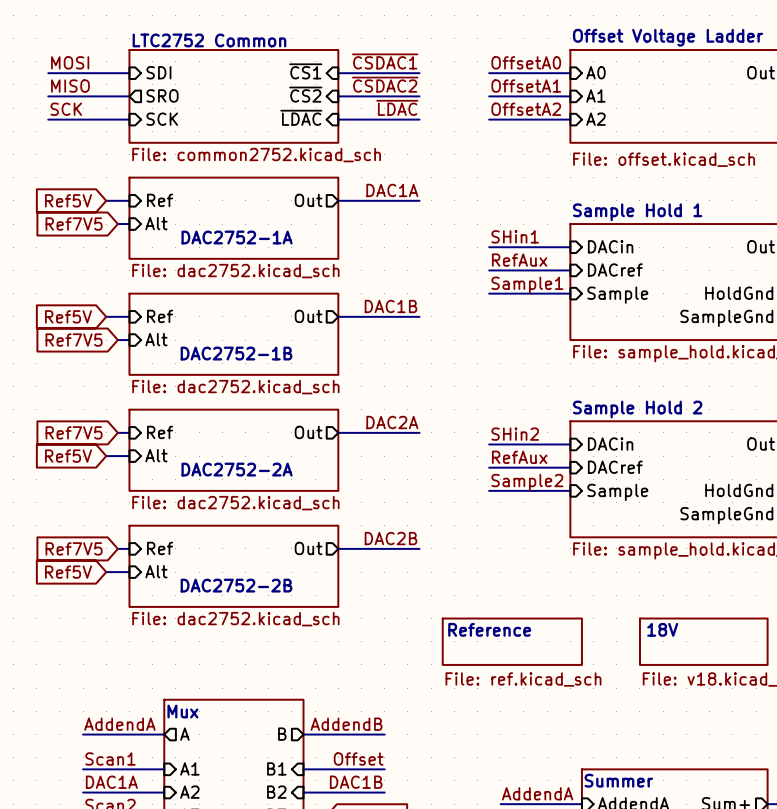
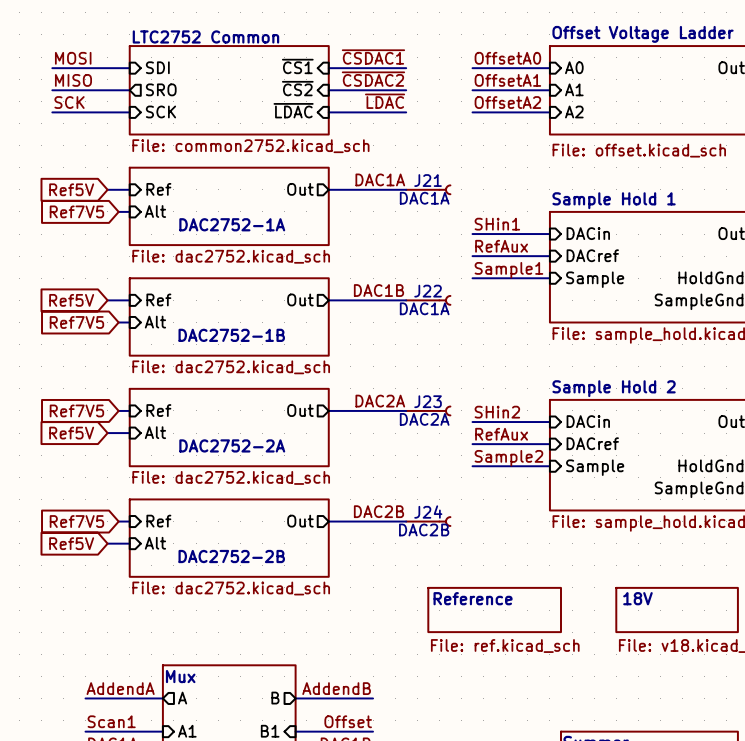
J21: none -> DAC1A (428, 189)
J22: none -> DAC1A (428, 300)
J23: none -> DAC2A (428, 410)
J24: none -> DAC2B (428, 521)

